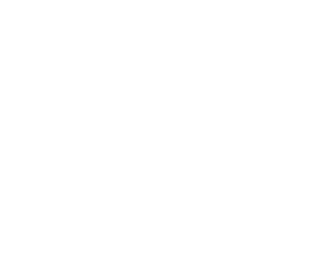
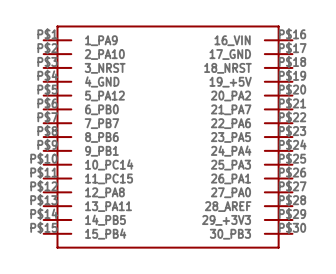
part: none -> (168, 137)

